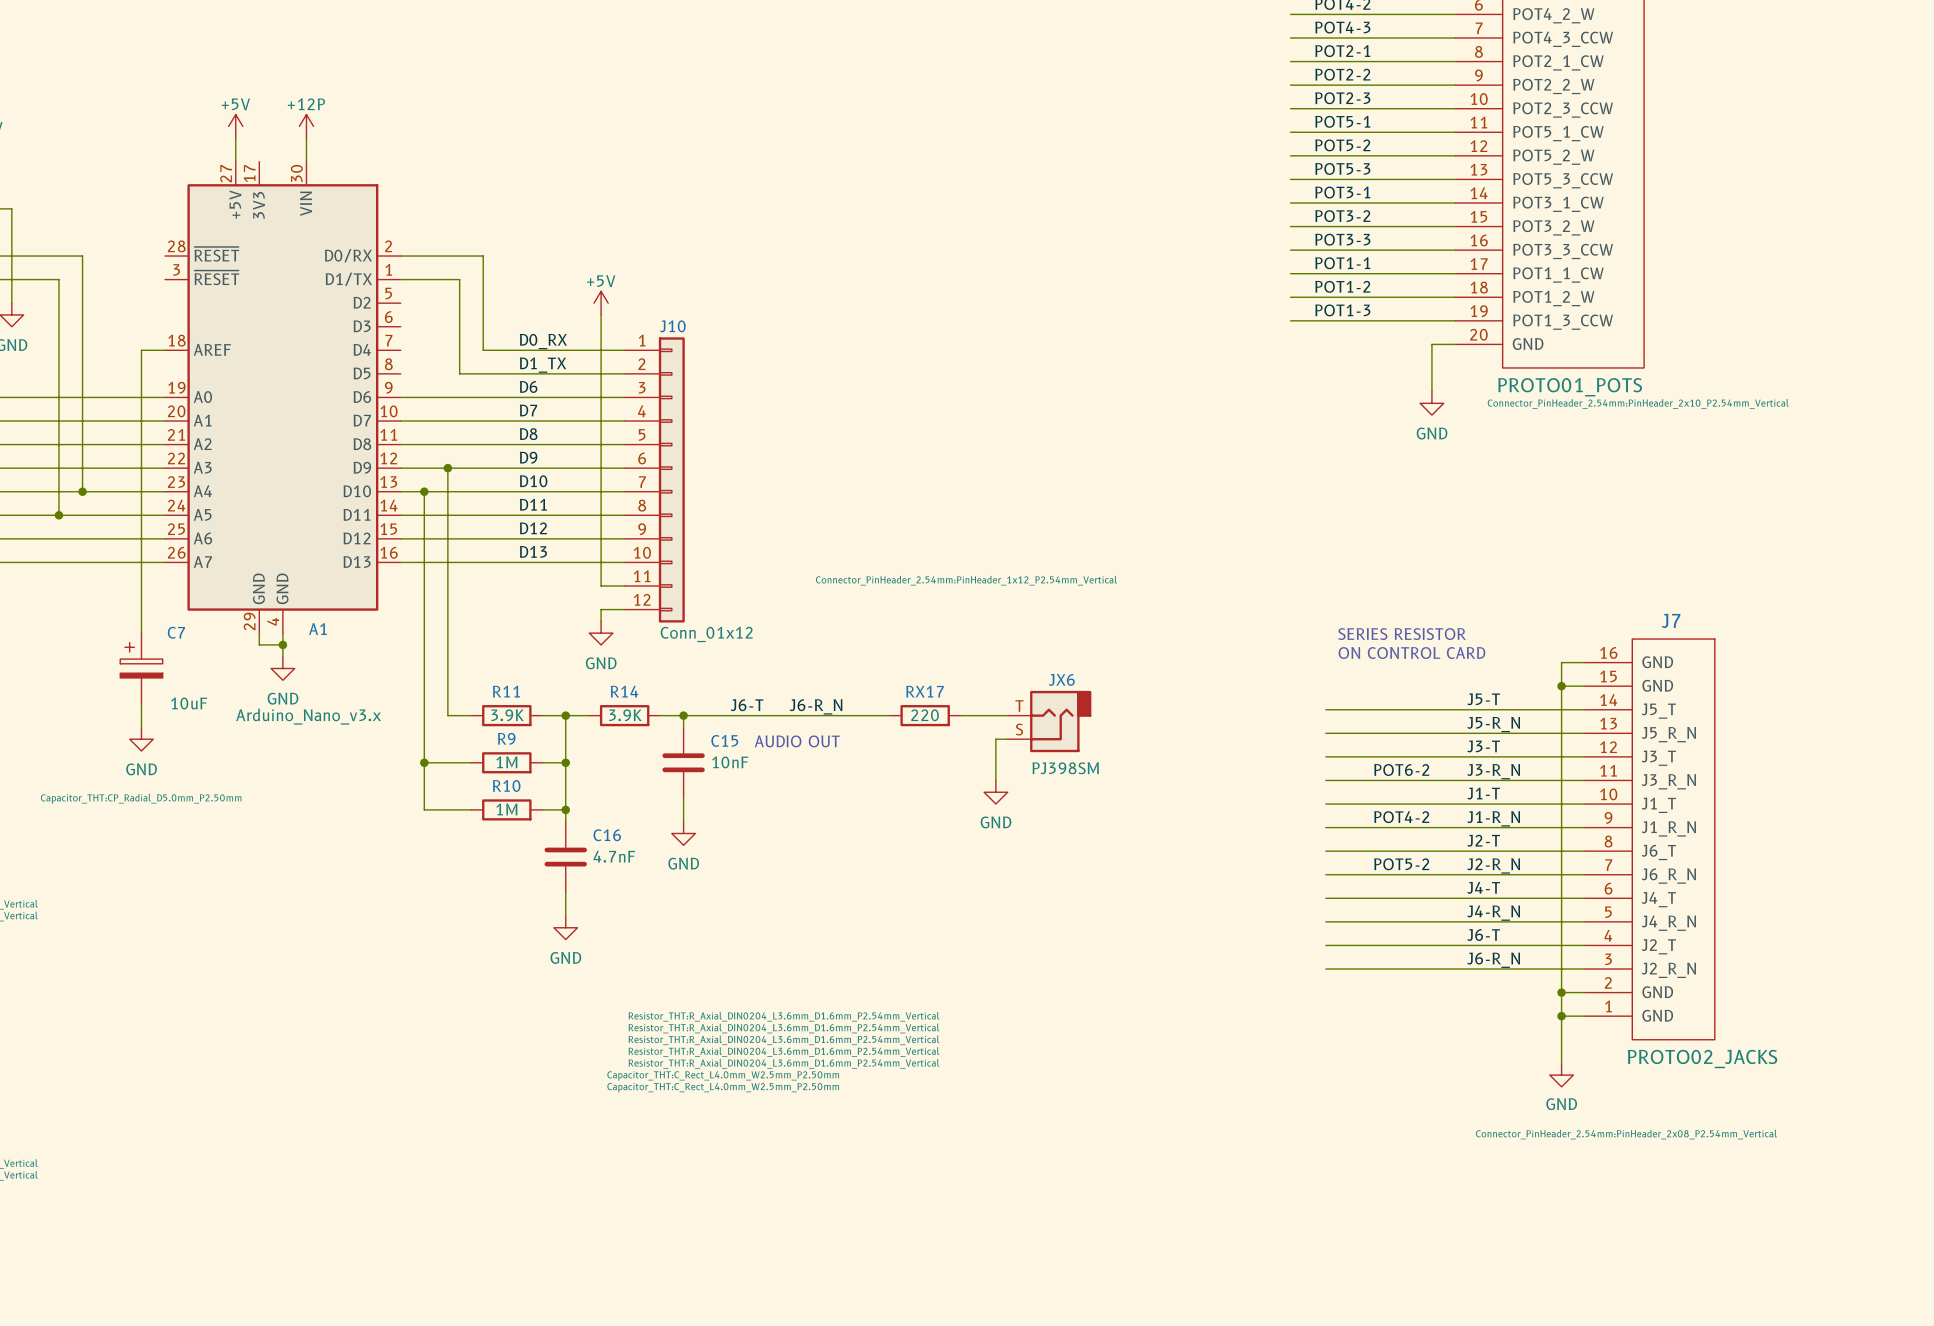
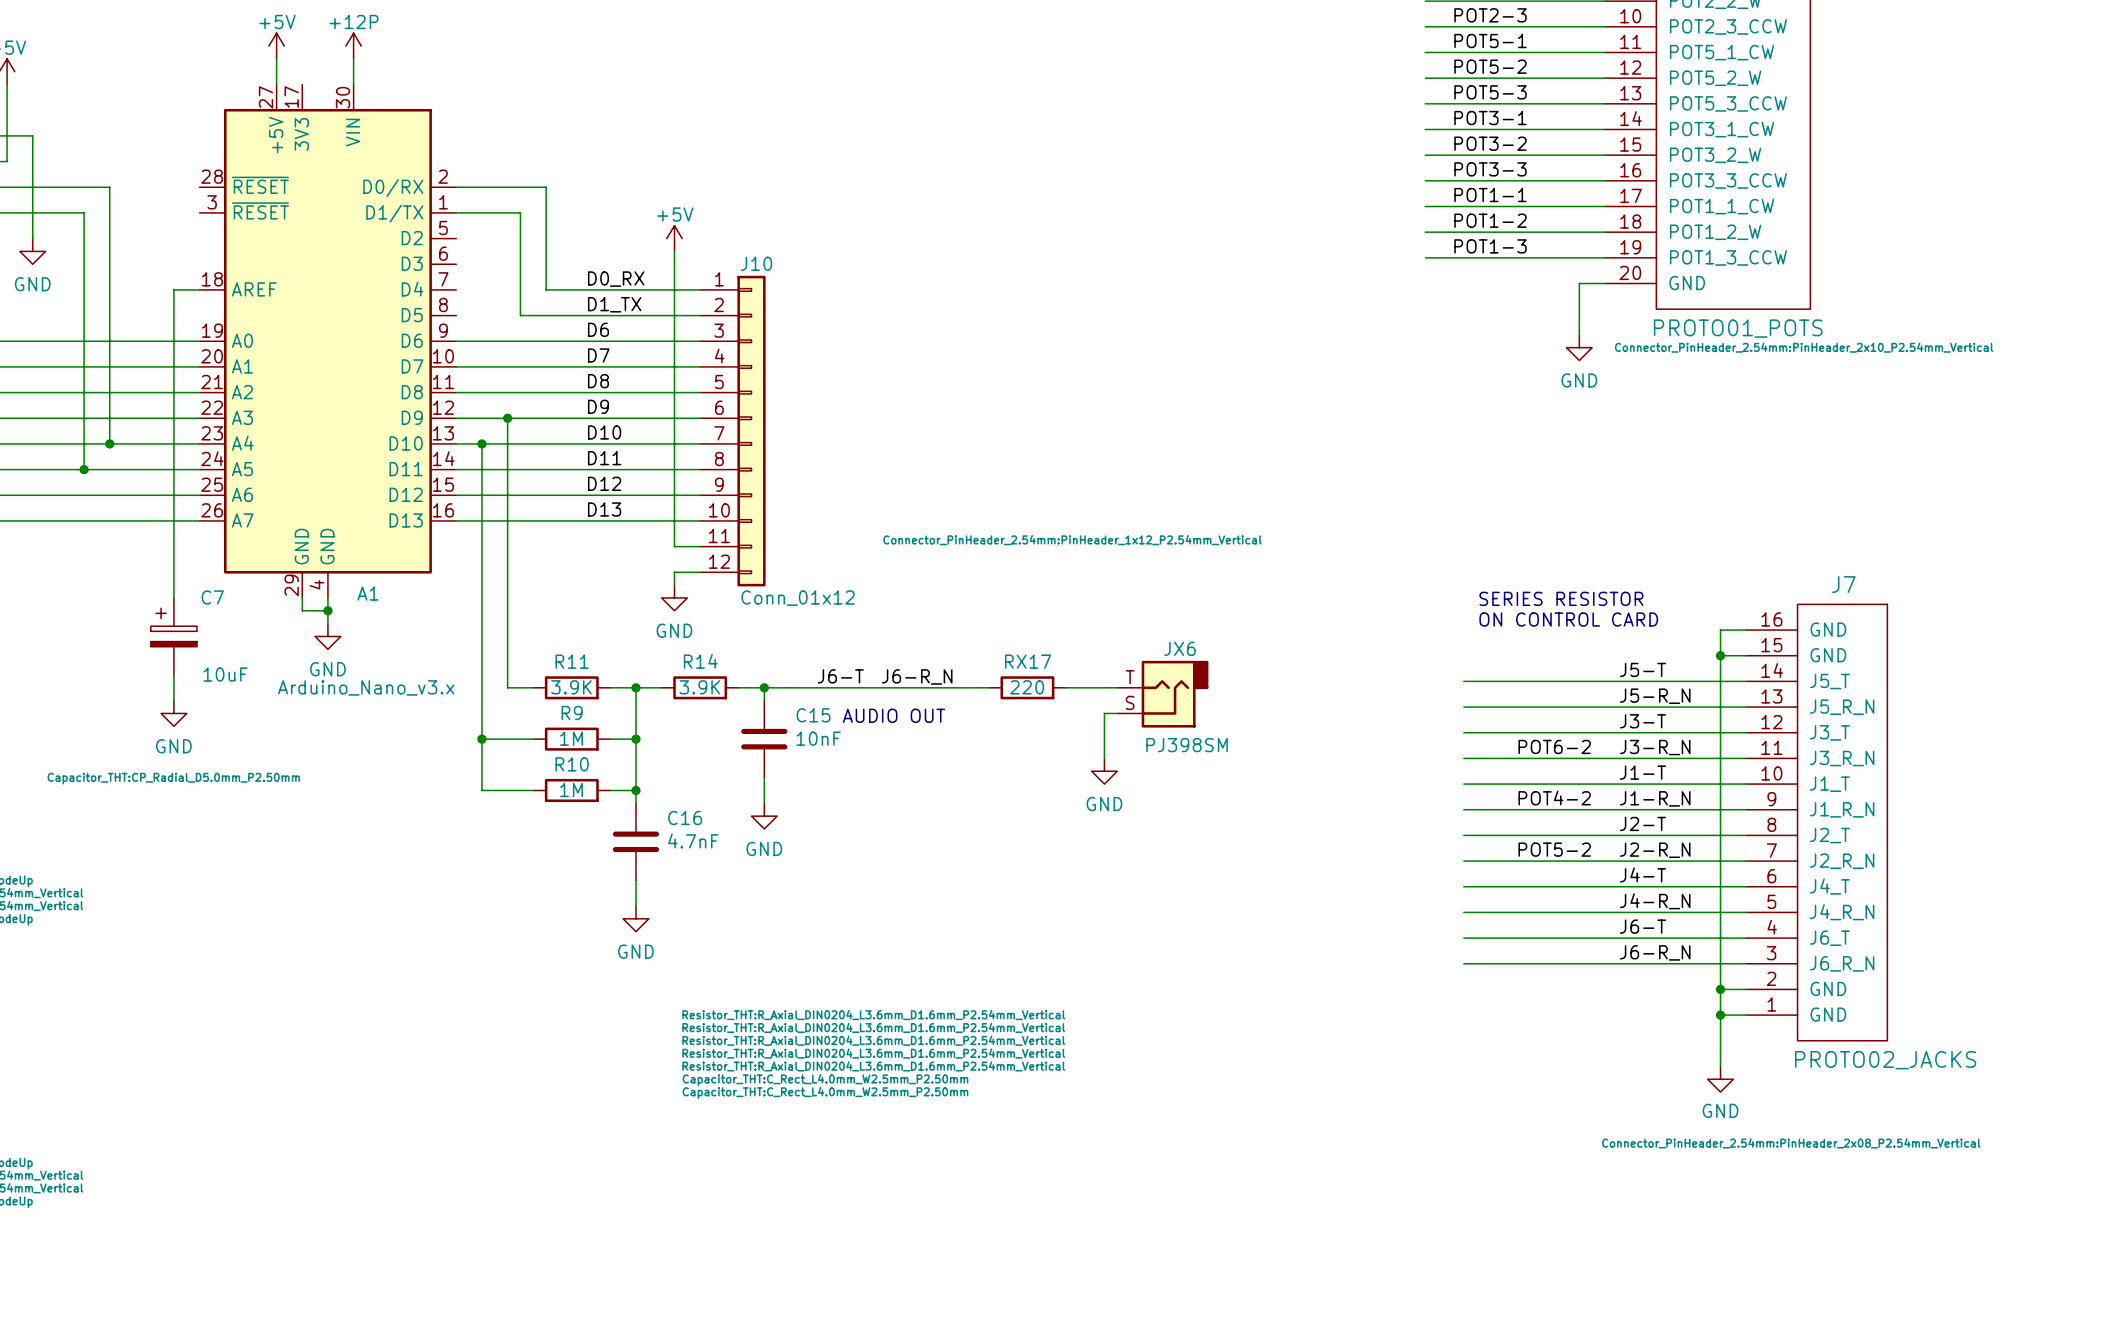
J7 pin name: J6_T (1658, 852) -> J2_T (1829, 835)
J7 pin name: J6_R_N (1668, 876) -> J2_R_N (1842, 861)
J7 pin name: J2_T (1658, 946) -> J6_T (1829, 938)
J7 pin name: J2_R_N (1668, 970) -> J6_R_N (1842, 963)

